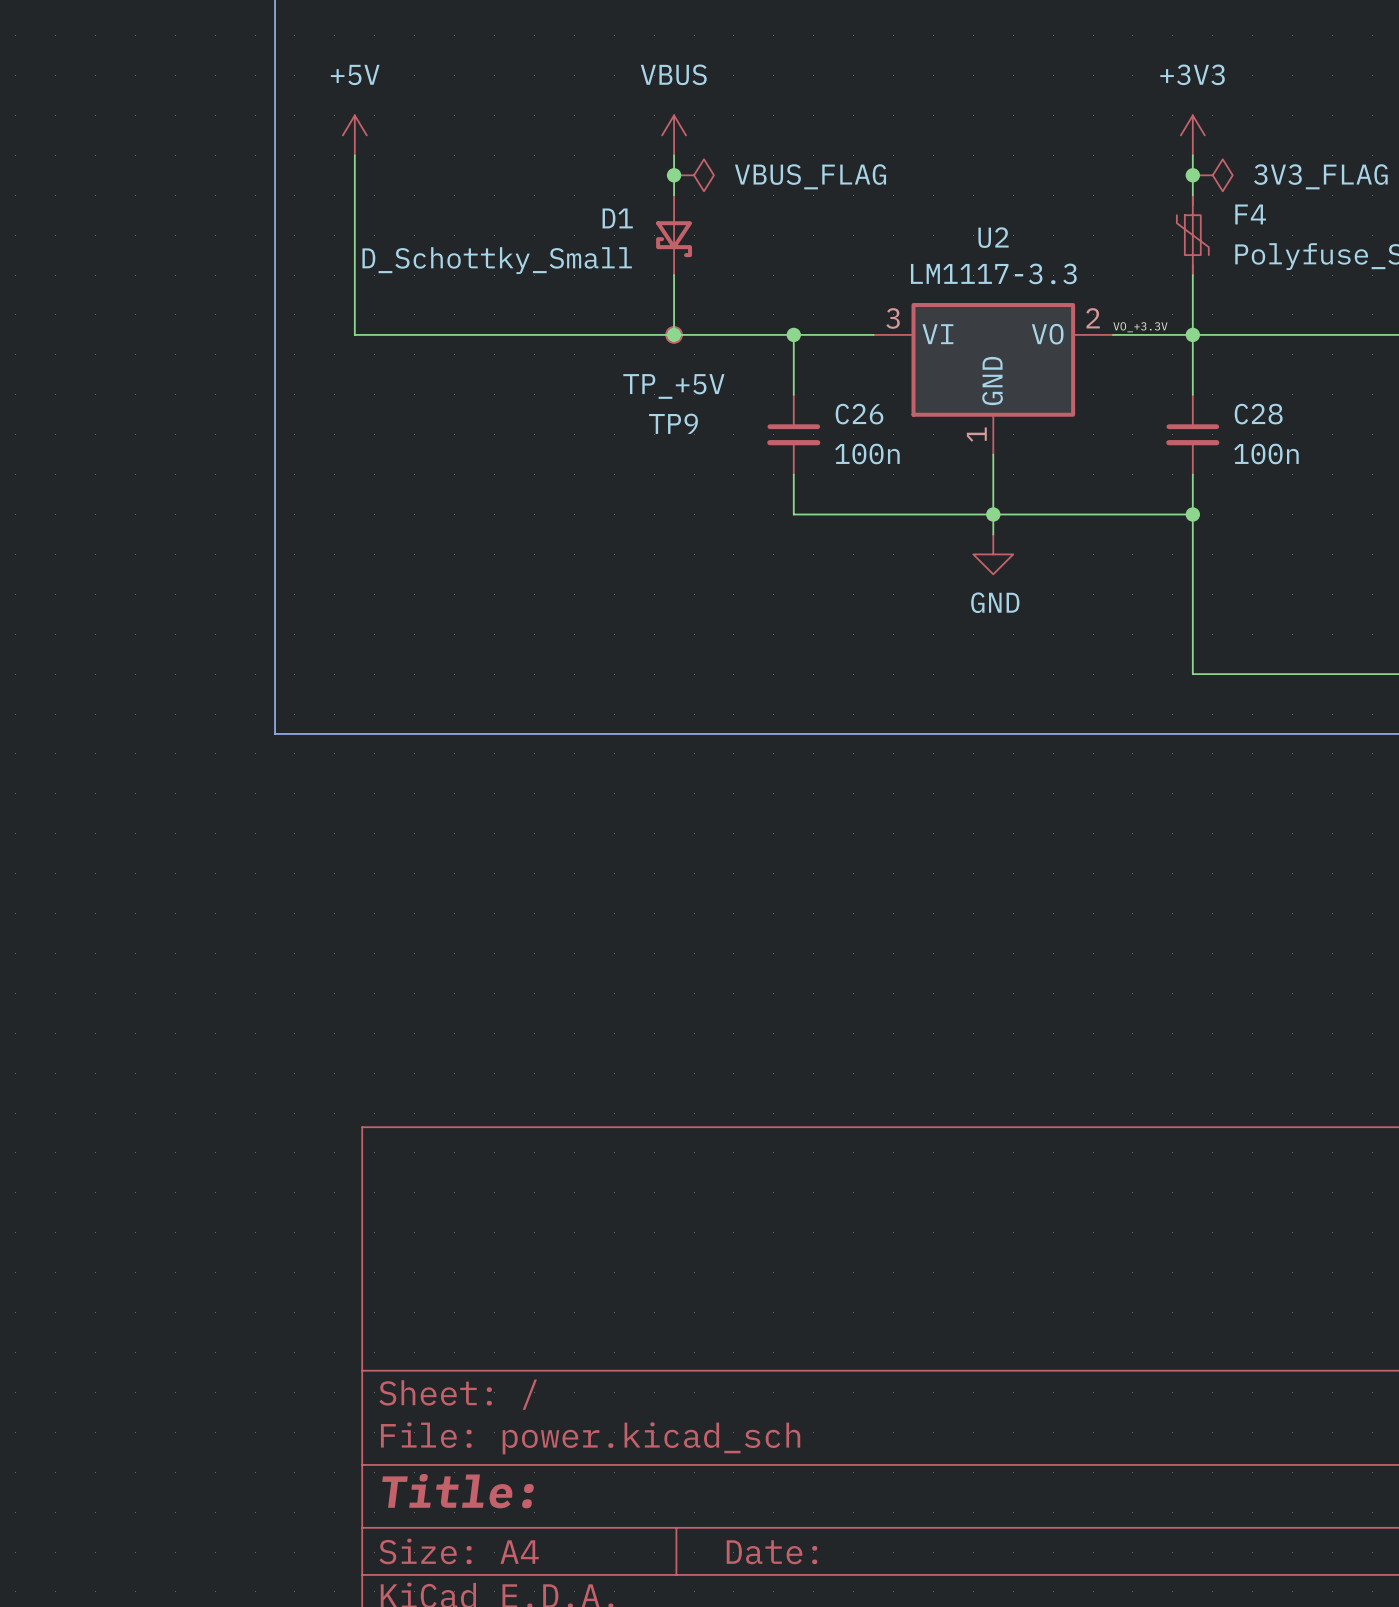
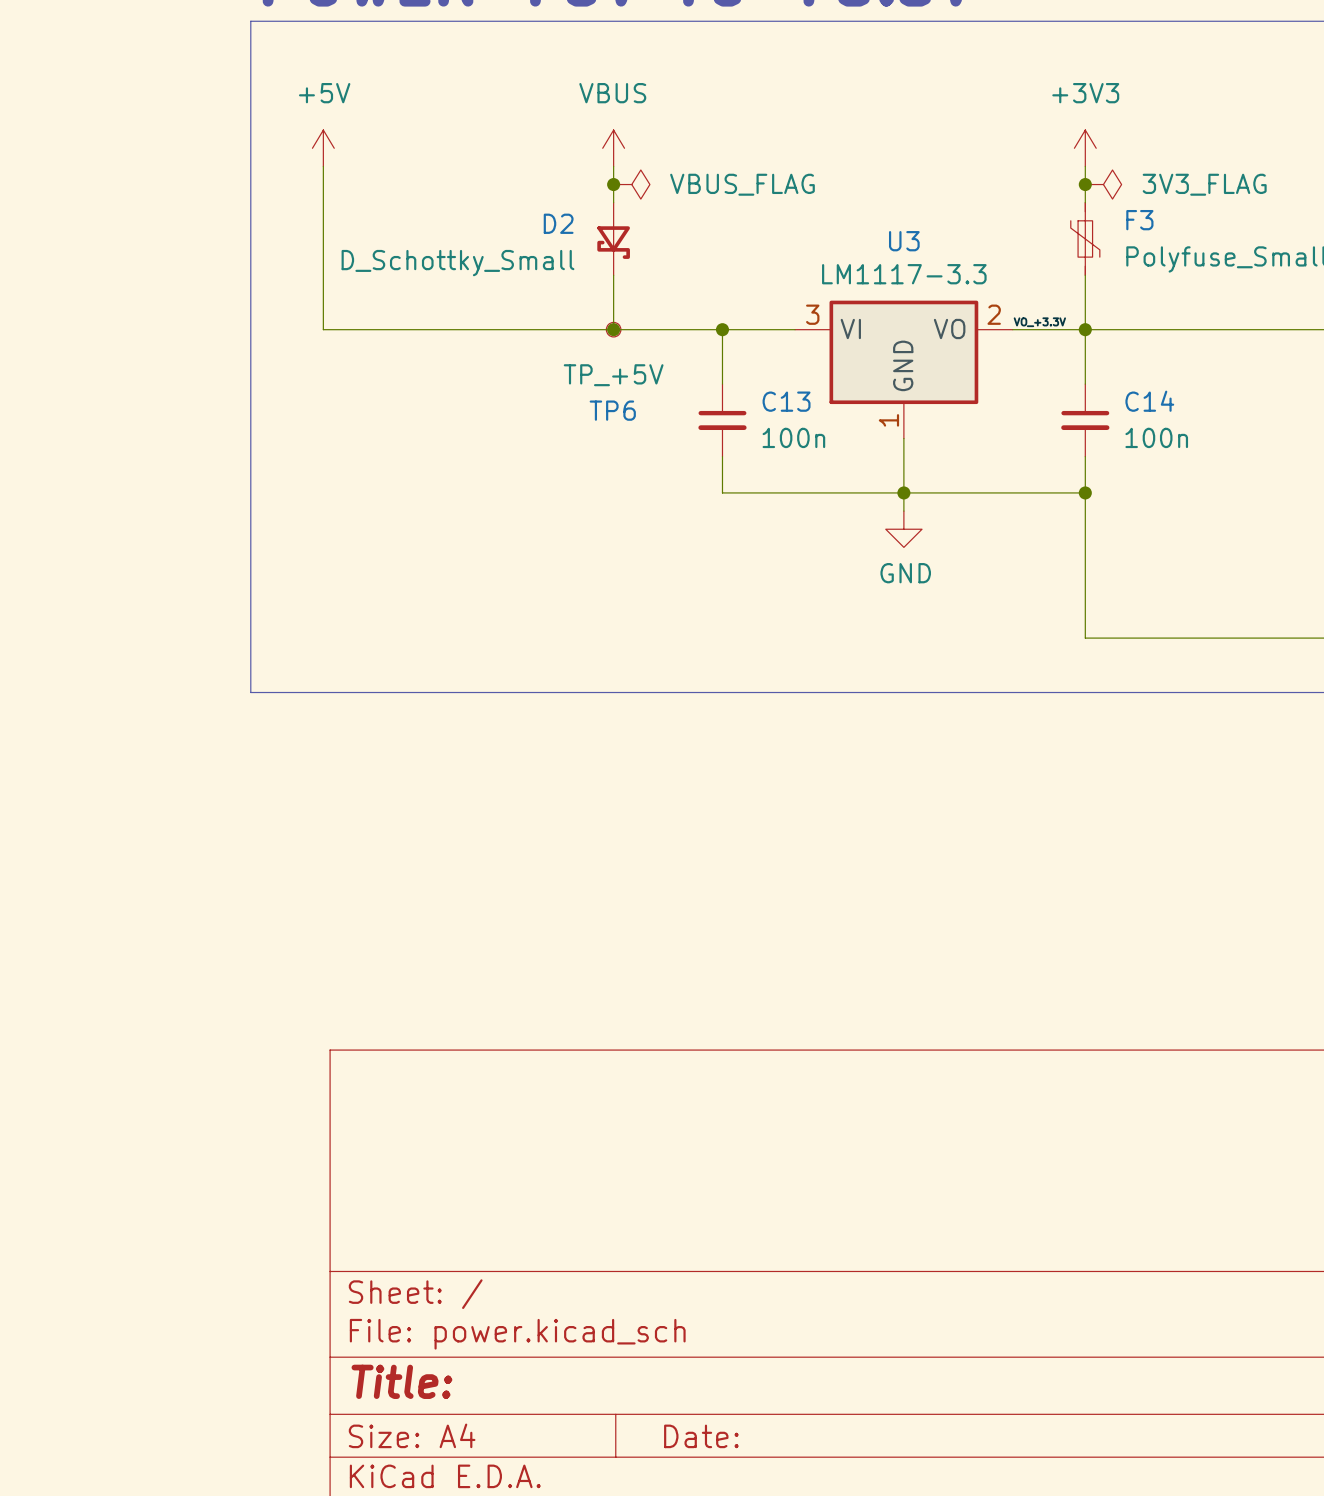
F4 name: F4 (1250, 214) -> F3 (1139, 220)
D1 name: D1 (617, 218) -> D2 (558, 223)
U2 name: U2 (993, 237) -> U3 (904, 241)
C26 name: C26 (859, 414) -> C13 (786, 401)
C28 name: C28 (1258, 414) -> C14 (1149, 401)
TP9 name: TP9 (673, 423) -> TP6 (612, 410)

